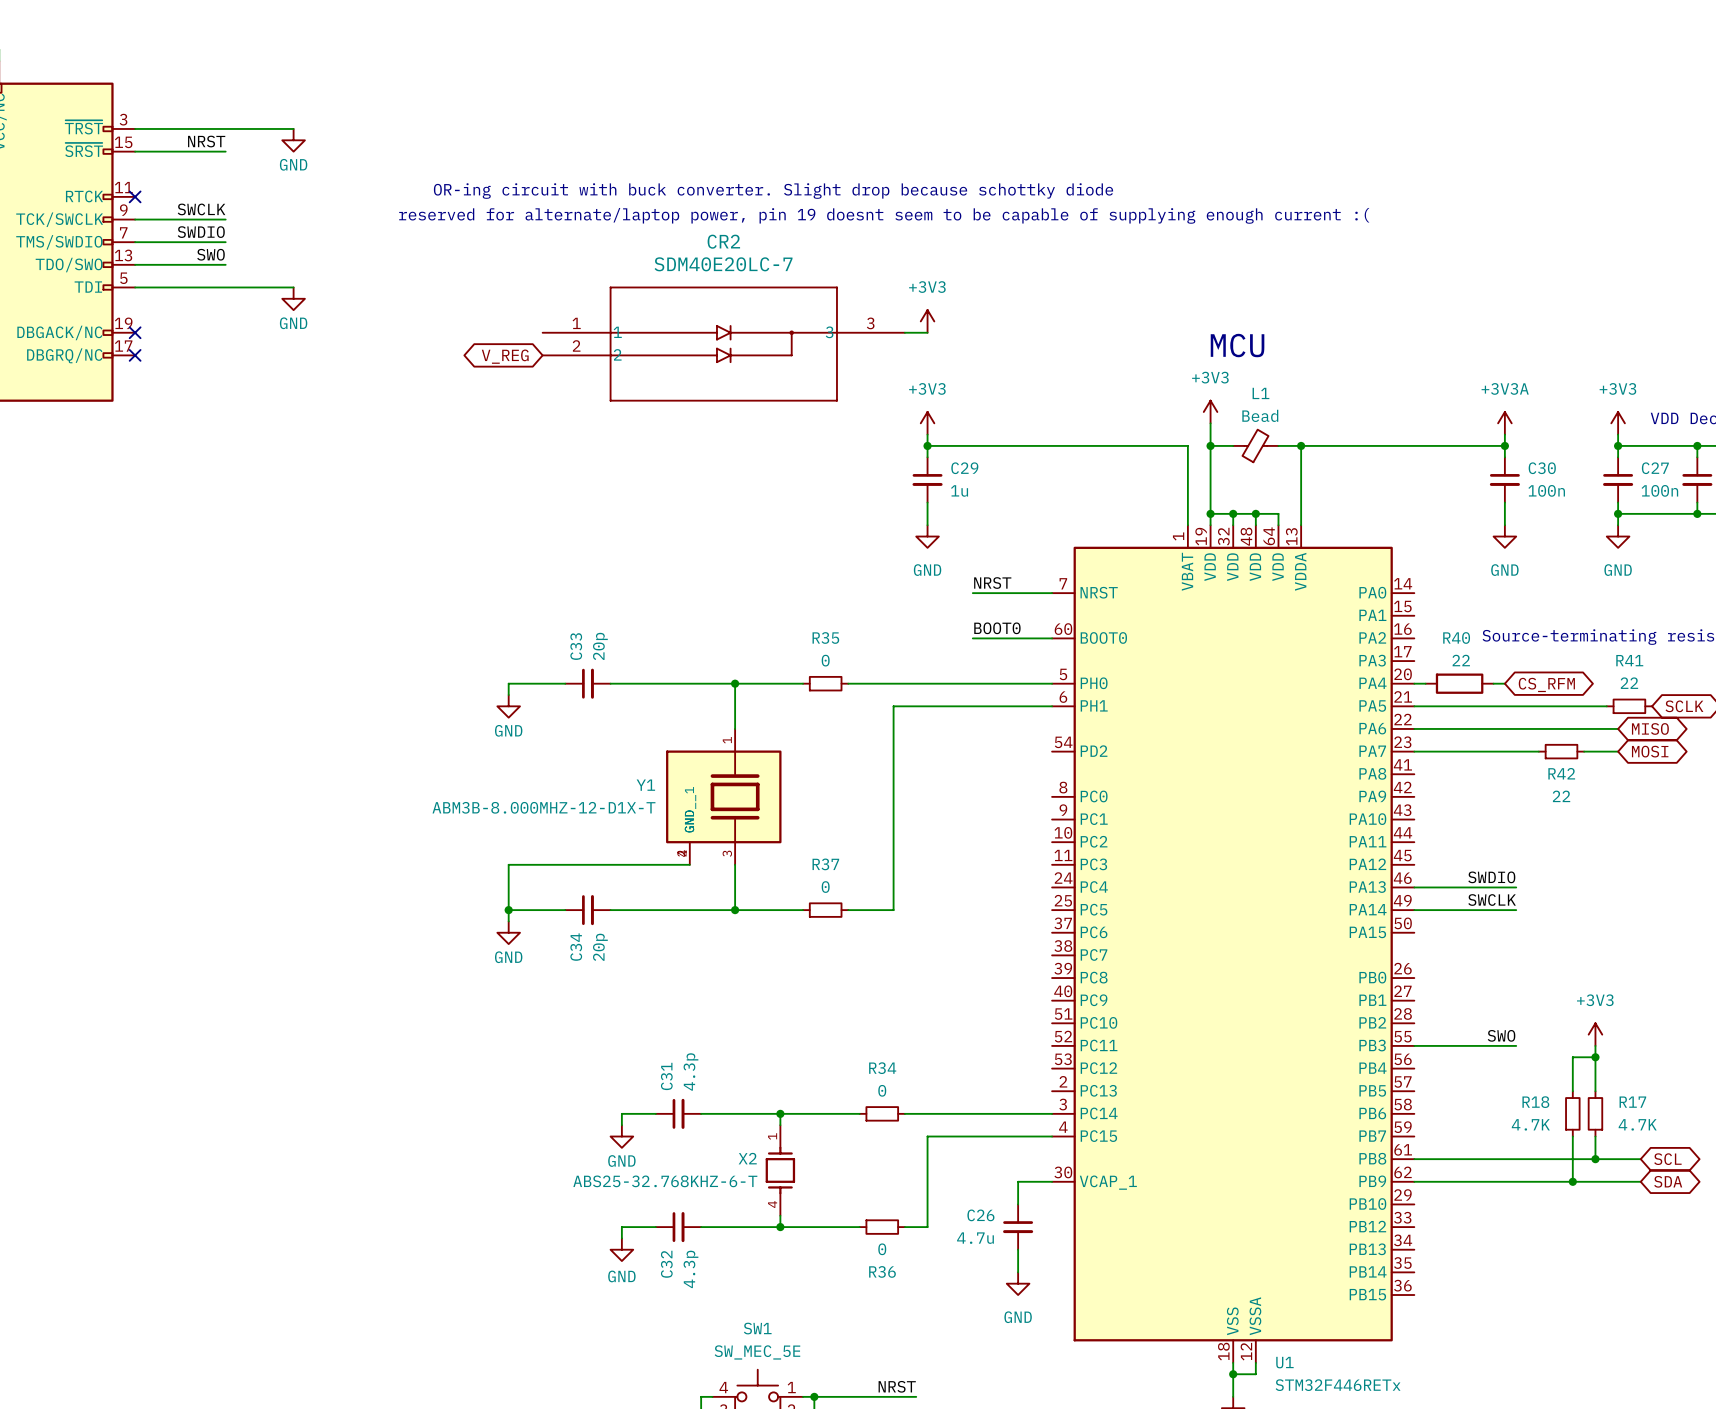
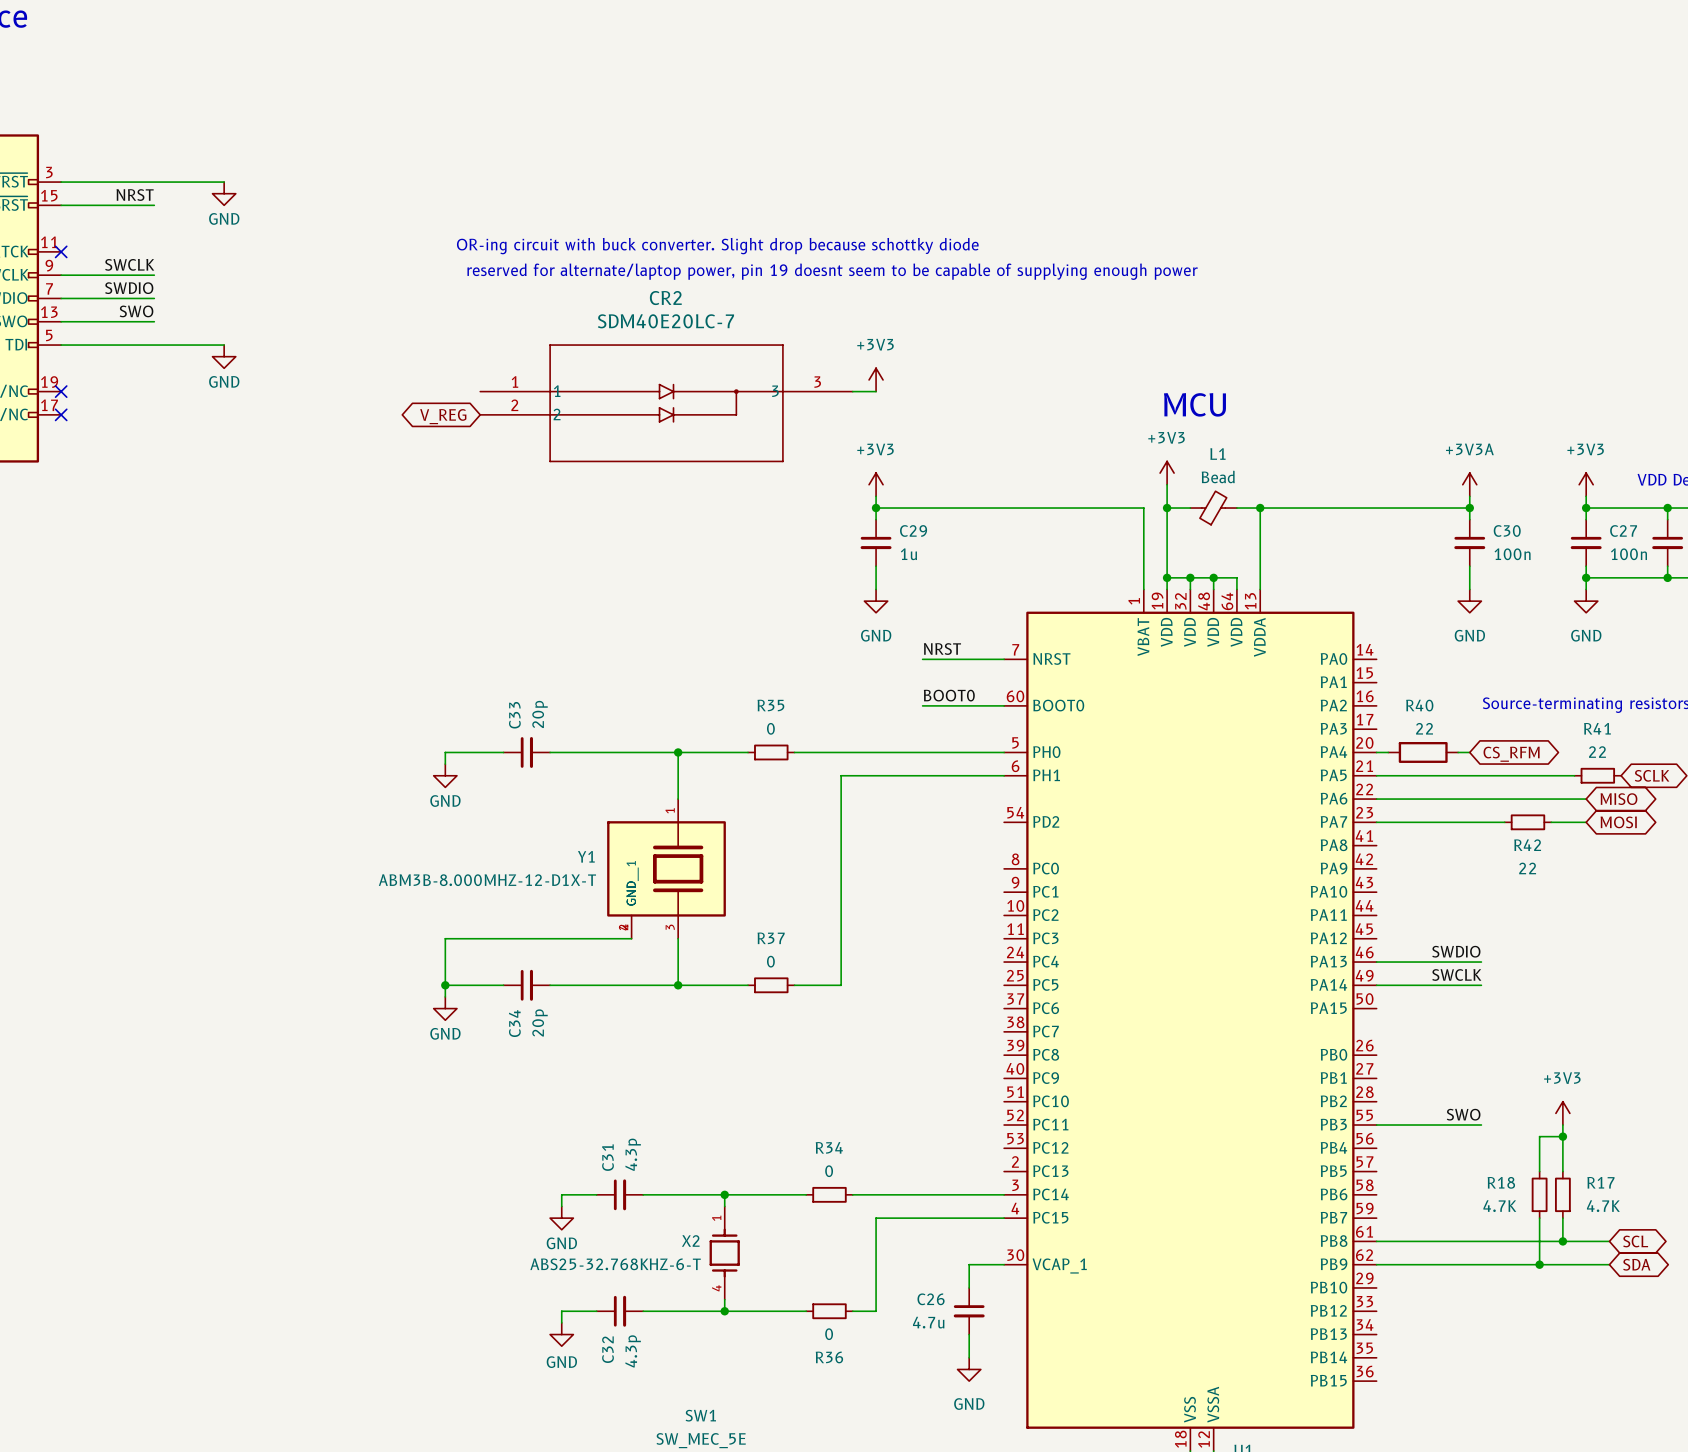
text: reserved for alternate/laptop power, pin 19 doesnt seem to be capable of supplying enough current :( (884, 215) -> reserved for alternate/laptop power, pin 19 doesnt seem to be capable of supplying enough power (832, 271)

